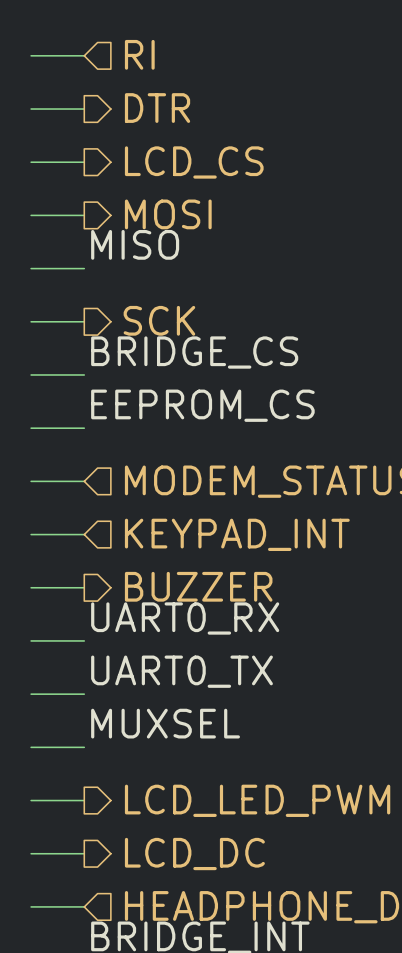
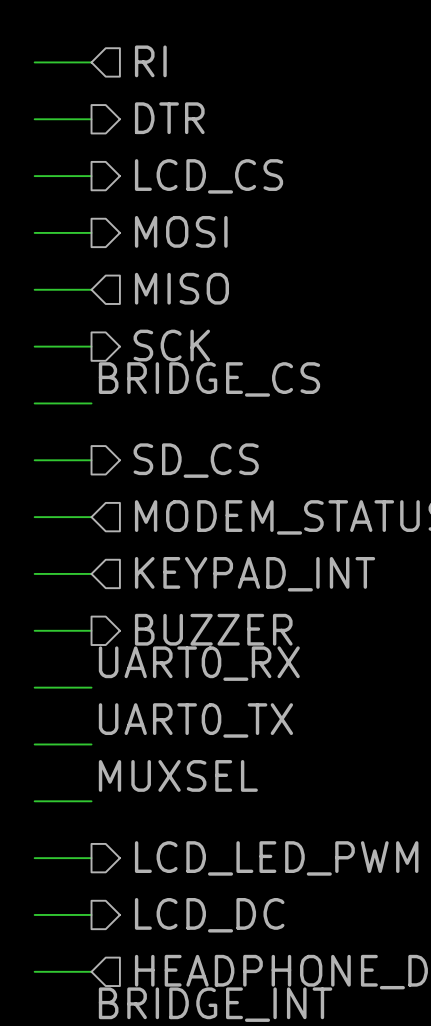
label: MISO (135, 244) -> none
hierarchical label: none -> MISO (181, 288)
label: EEPROM_CS (202, 405) -> none
hierarchical label: none -> SD_CS (196, 460)

